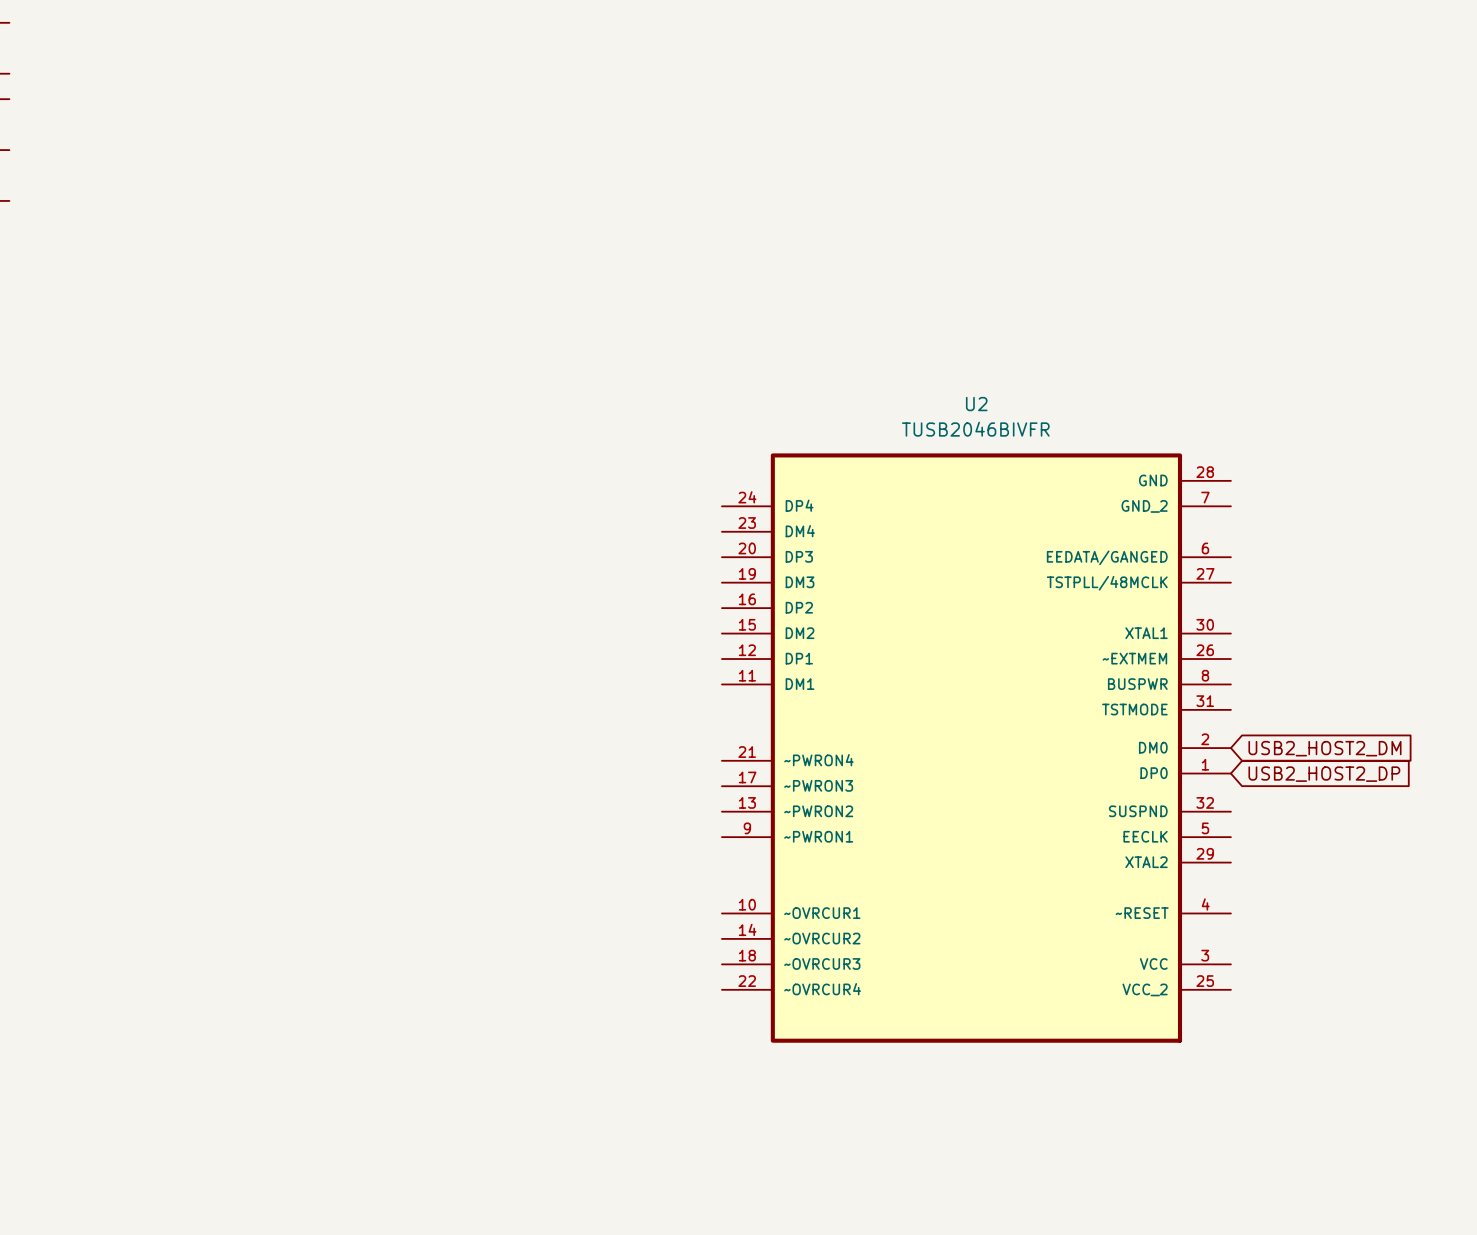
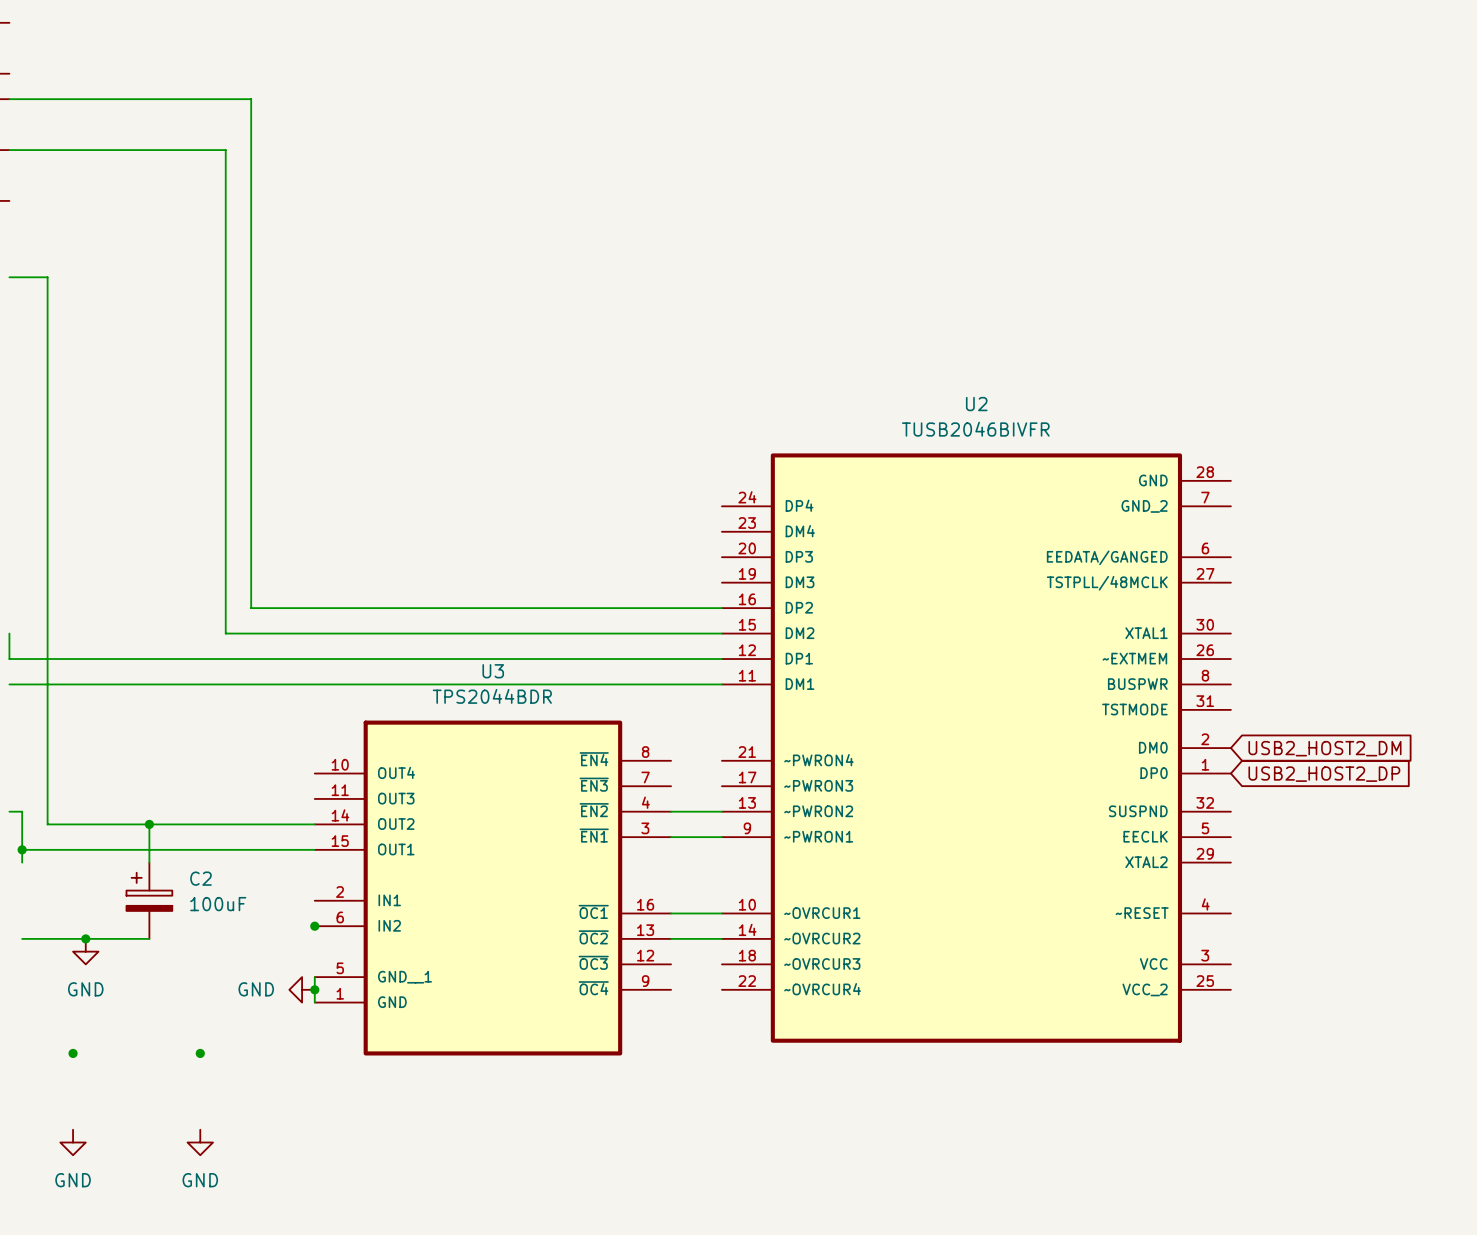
wire: none -> (9, 99) (251, 99) (251, 608) (721, 608)
wire: none -> (9, 150) (225, 150) (225, 633) (721, 633)
wire: none -> (9, 277) (47, 277) (47, 824) (314, 824)
wire: none -> (9, 633) (9, 659) (721, 659)
wire: none -> (9, 684) (721, 684)
wire: none -> (9, 811) (22, 811) (22, 862)
wire: none -> (671, 811) (721, 811)
wire: none -> (149, 824) (149, 862)
junction: none -> (149, 824)
wire: none -> (671, 837) (721, 837)
wire: none -> (22, 849) (314, 849)
junction: none -> (22, 849)
U3: none -> TPS2044BDR (492, 888)
C2: none -> 100uF (149, 900)
wire: none -> (671, 913) (721, 913)
junction: none -> (314, 926)
wire: none -> (22, 938) (149, 938)
junction: none -> (85, 938)
wire: none -> (671, 938) (721, 938)
power symbol: none -> GND (85, 951)
wire: none -> (314, 977) (314, 1002)
power symbol: none -> GND (302, 989)
junction: none -> (314, 989)
junction: none -> (73, 1053)
junction: none -> (200, 1053)
power symbol: none -> GND (73, 1142)
power symbol: none -> GND (200, 1142)

